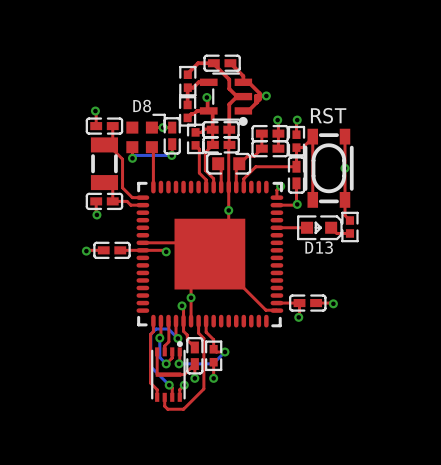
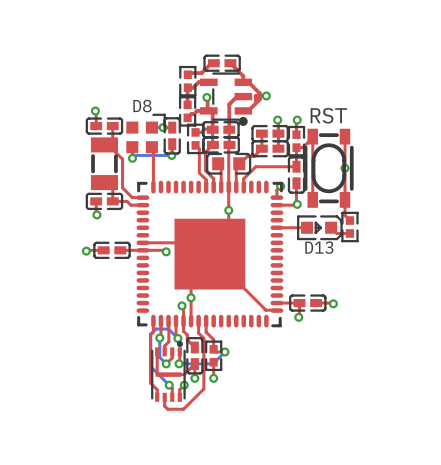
top track: none -> (213, 62) (201, 73) (186, 74)
top track: (187, 74) (198, 63) (213, 63) (229, 79) (229, 88) (237, 96) -> none

